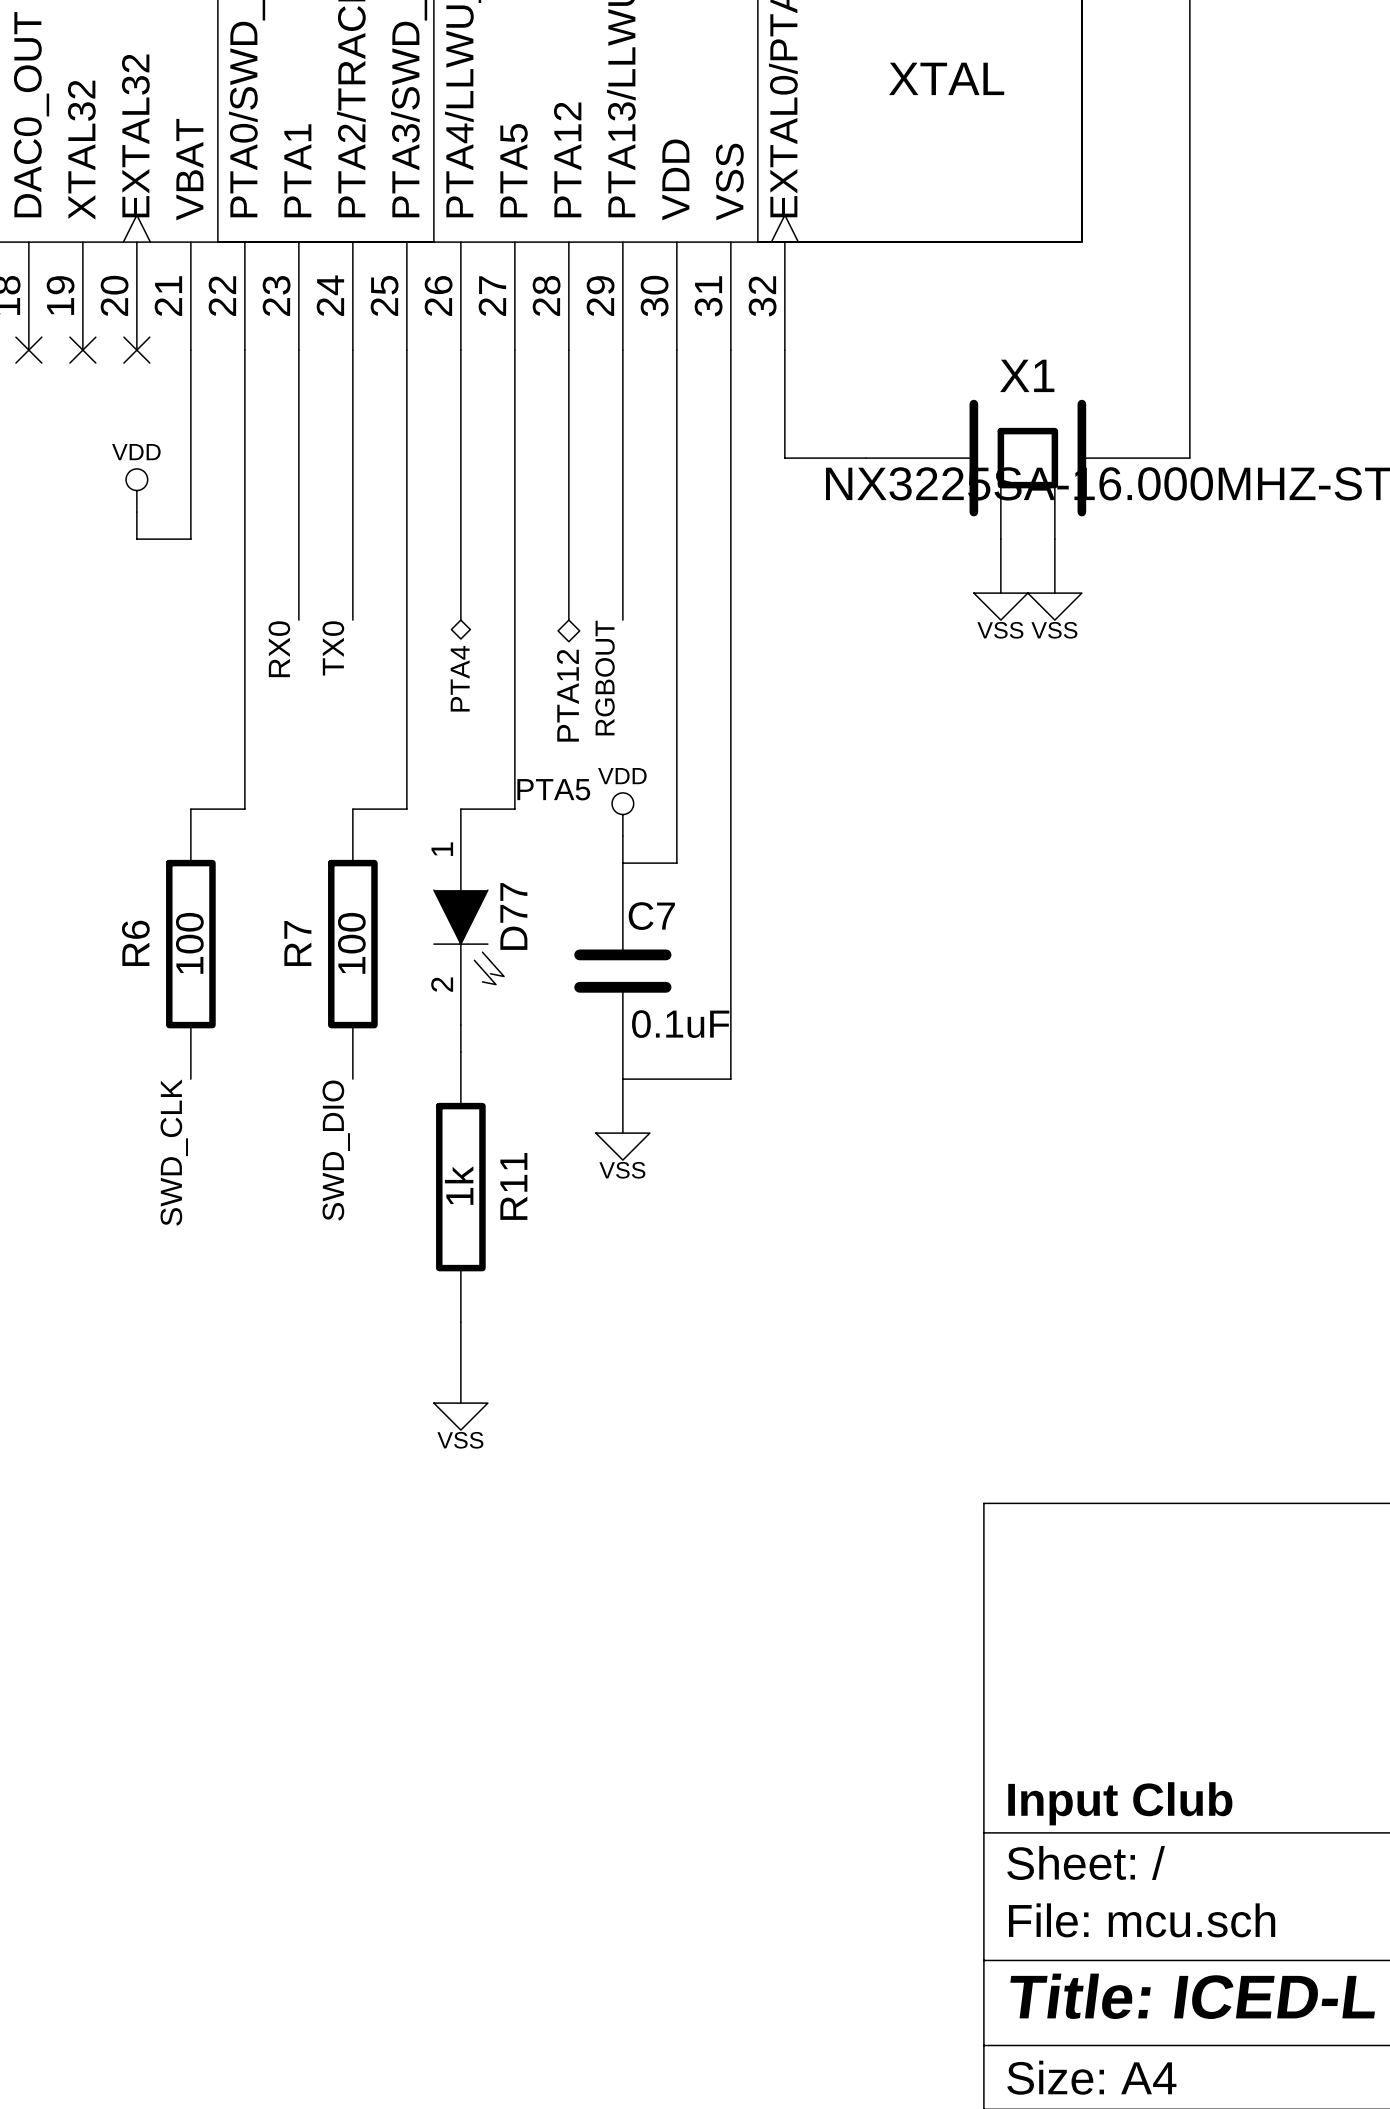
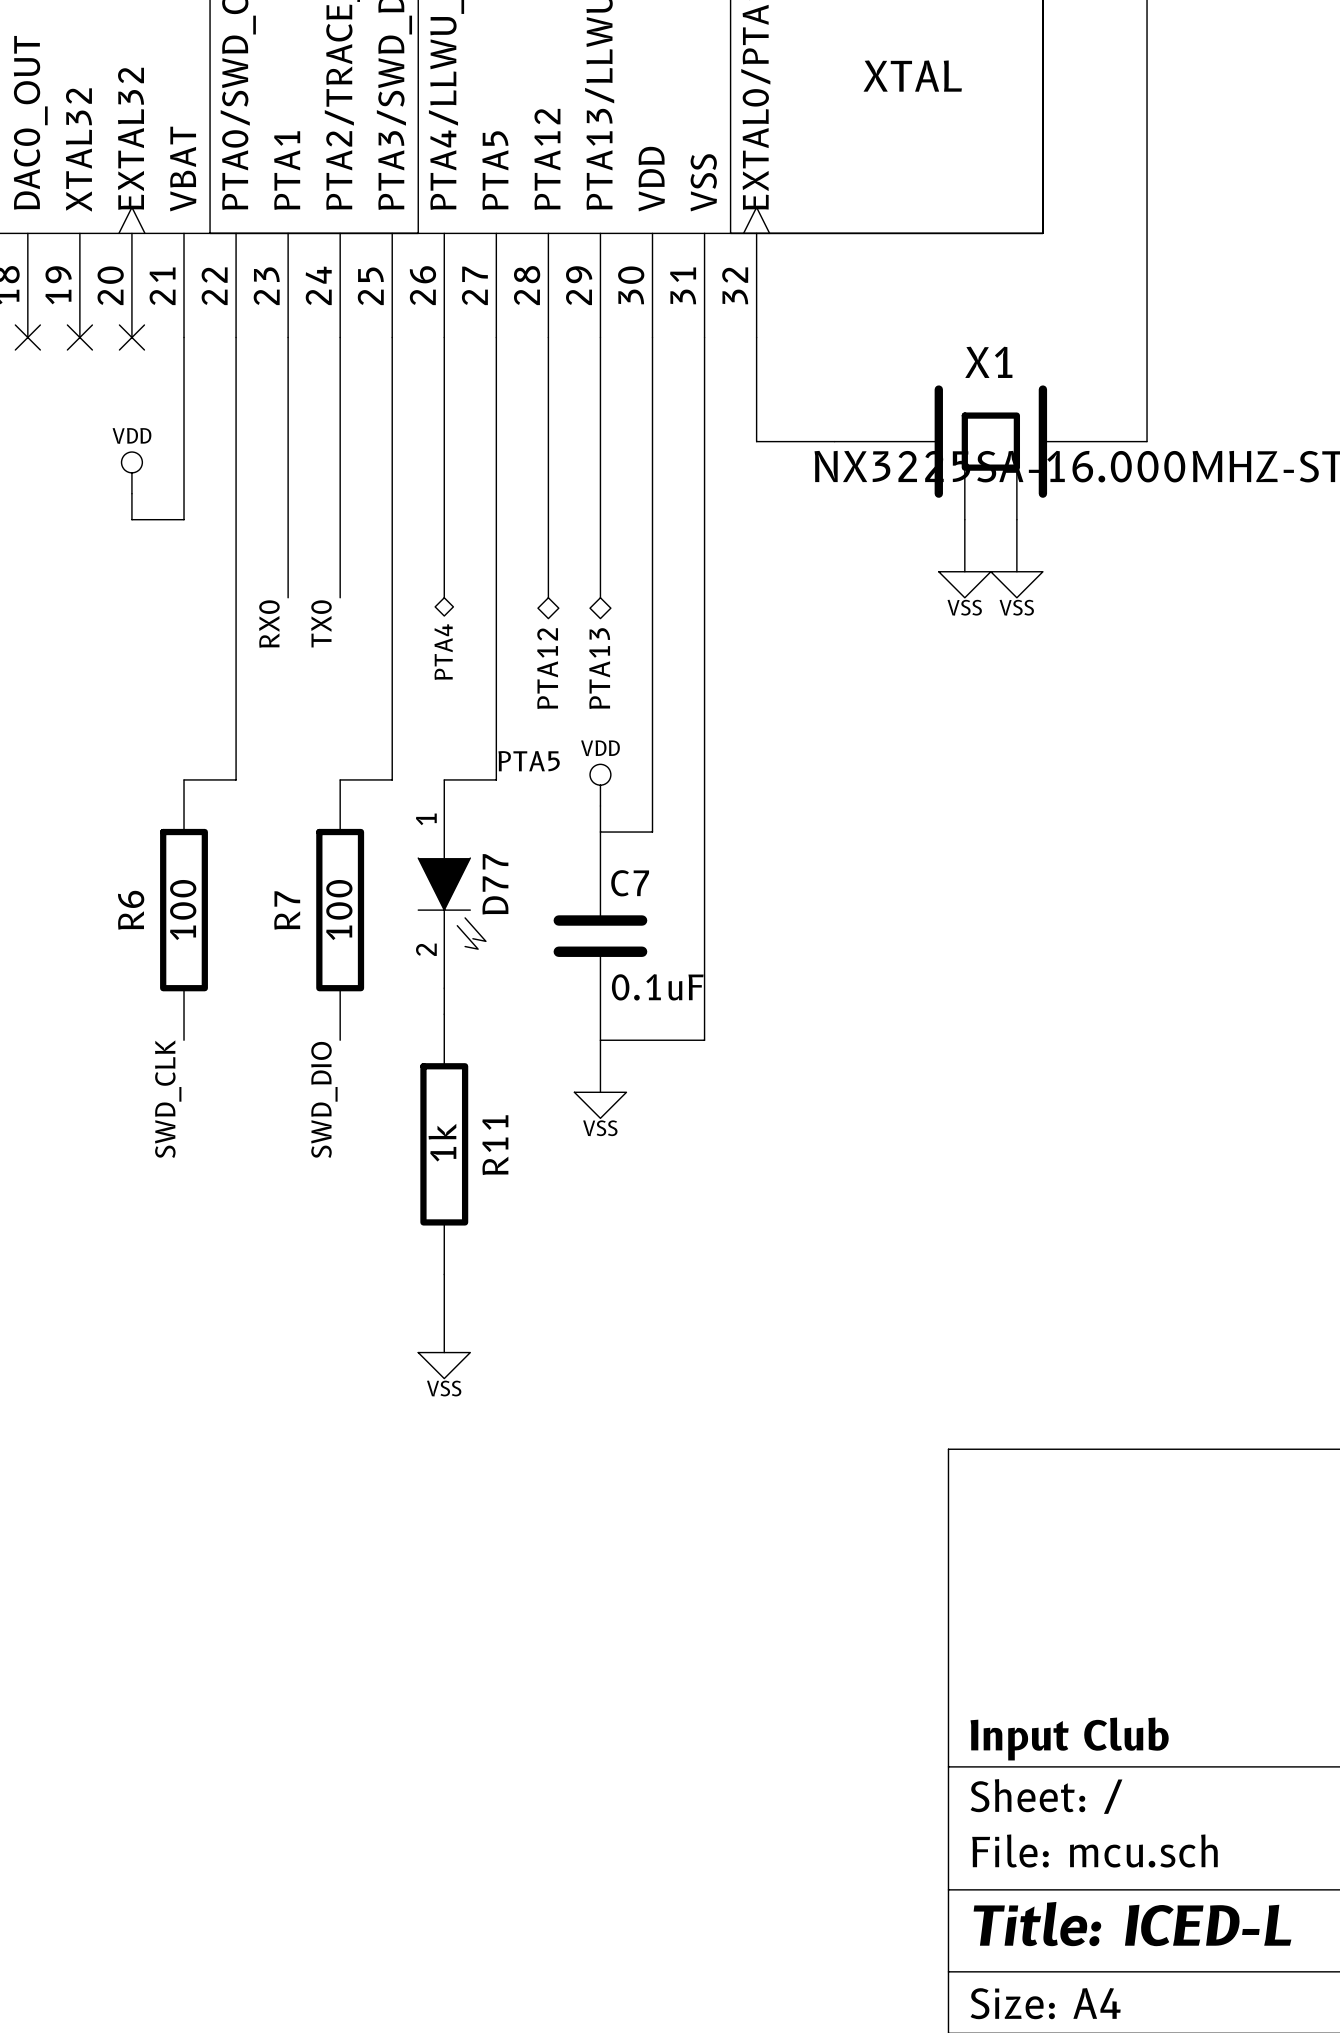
label: RGBOUT (605, 678) -> none
hierarchical label: none -> PTA13 (599, 668)

